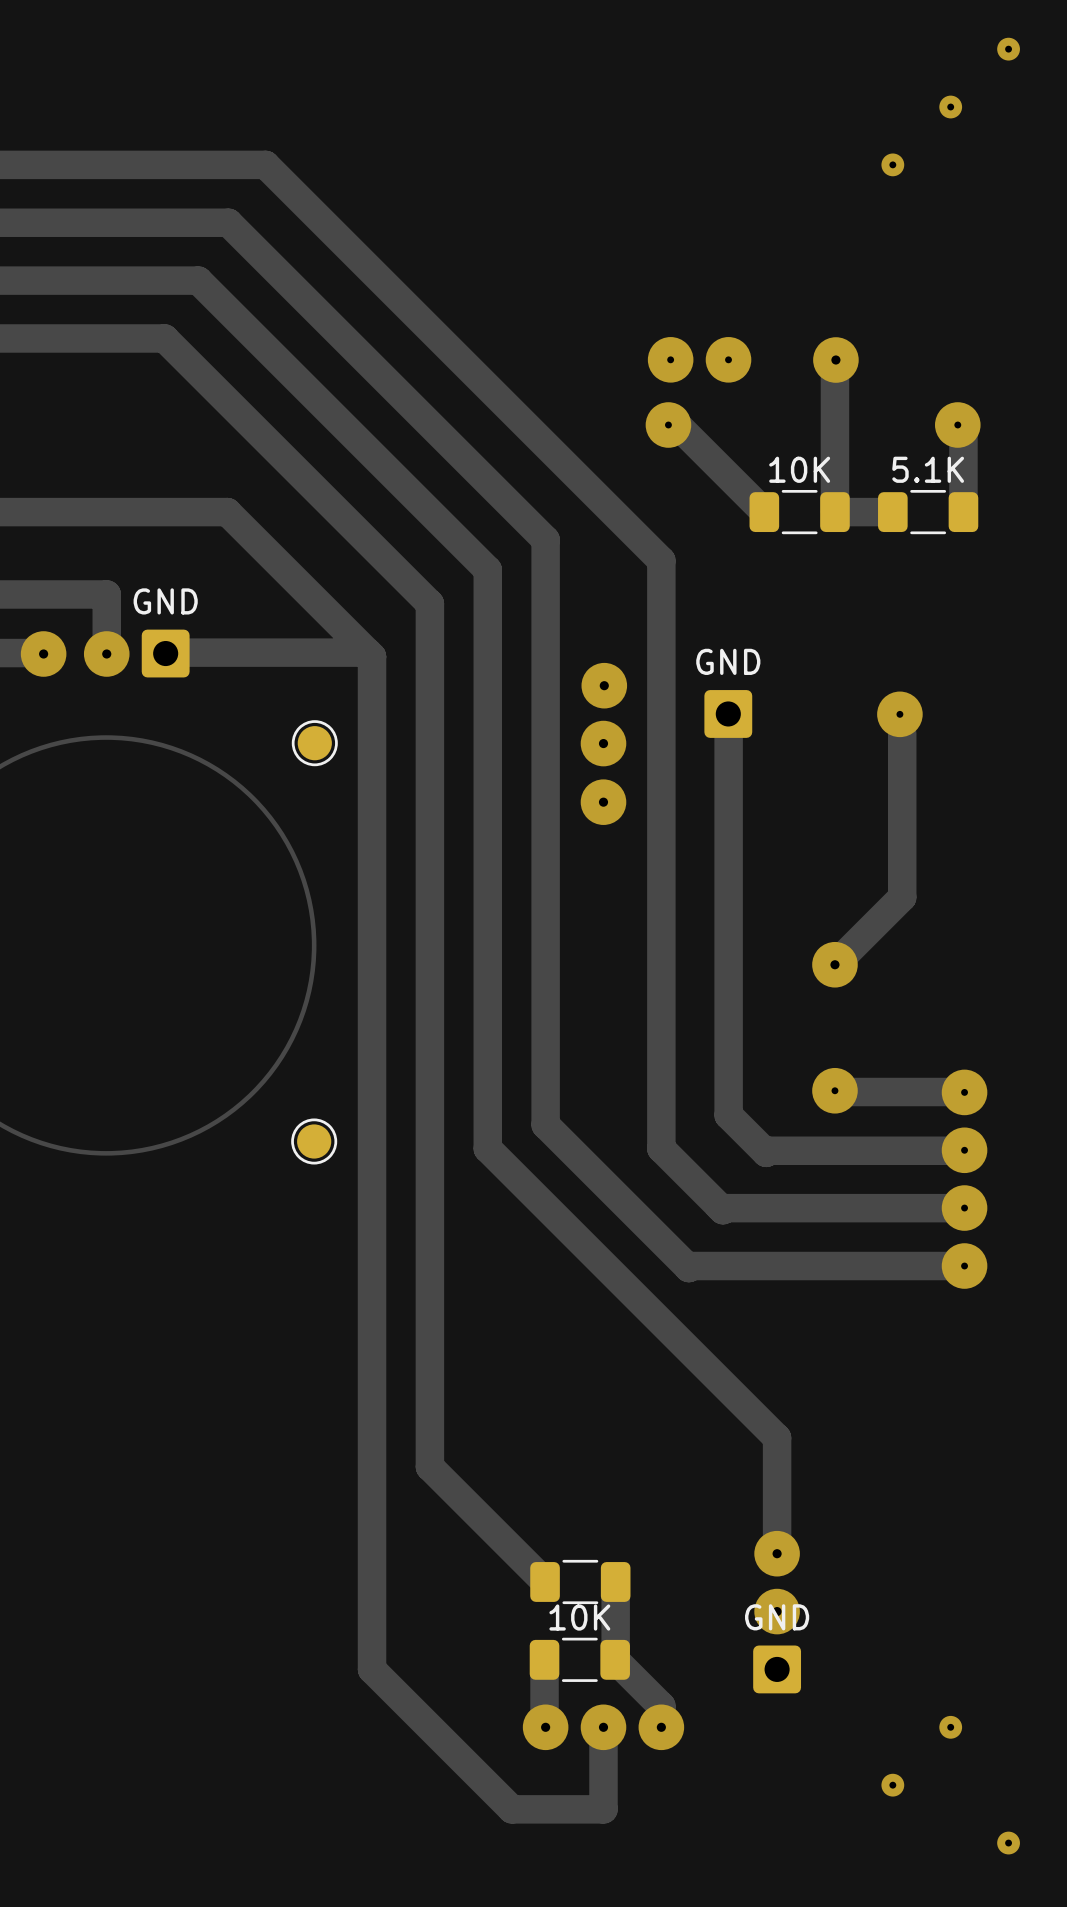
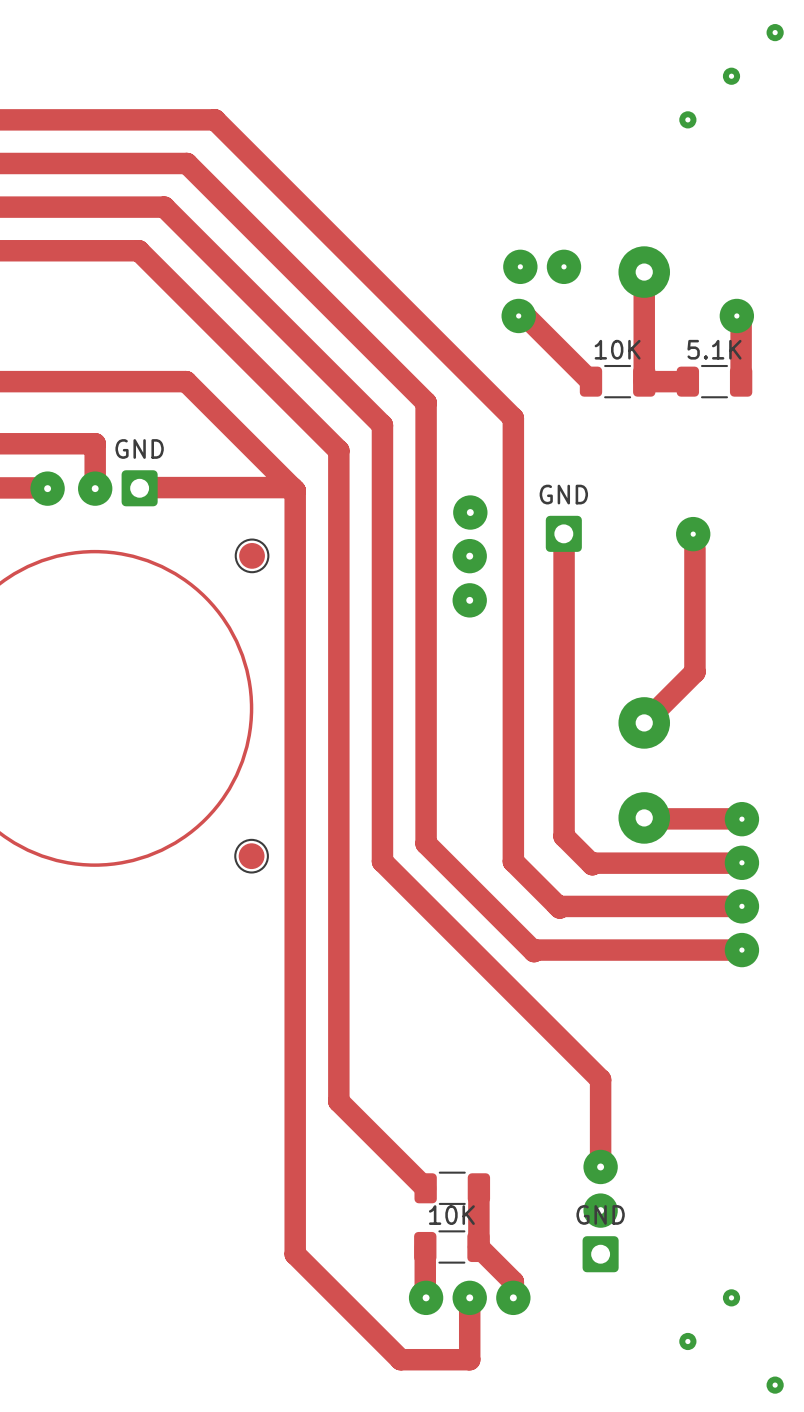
via size: [813, 337, 859, 383] -> [618, 246, 671, 298]
via size: [812, 941, 858, 988] -> [618, 697, 671, 749]
via size: [812, 1067, 858, 1114] -> [618, 792, 671, 844]

